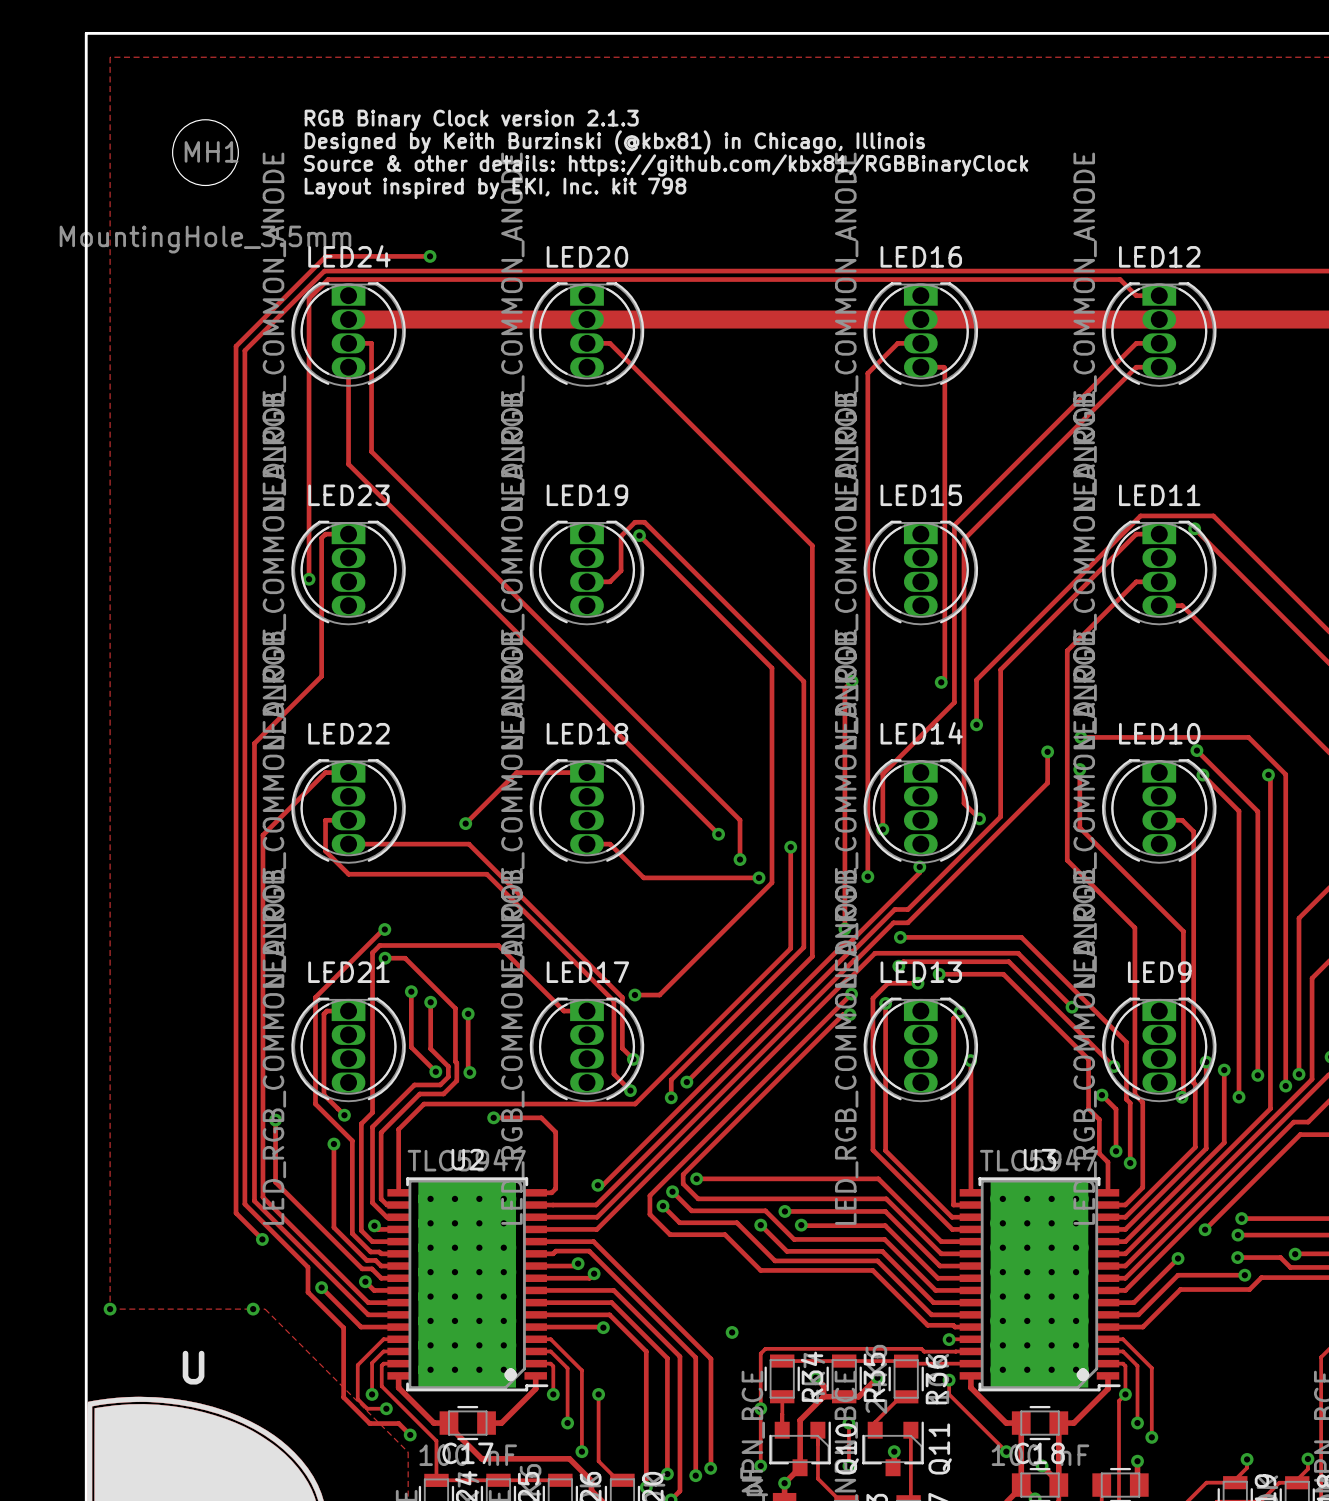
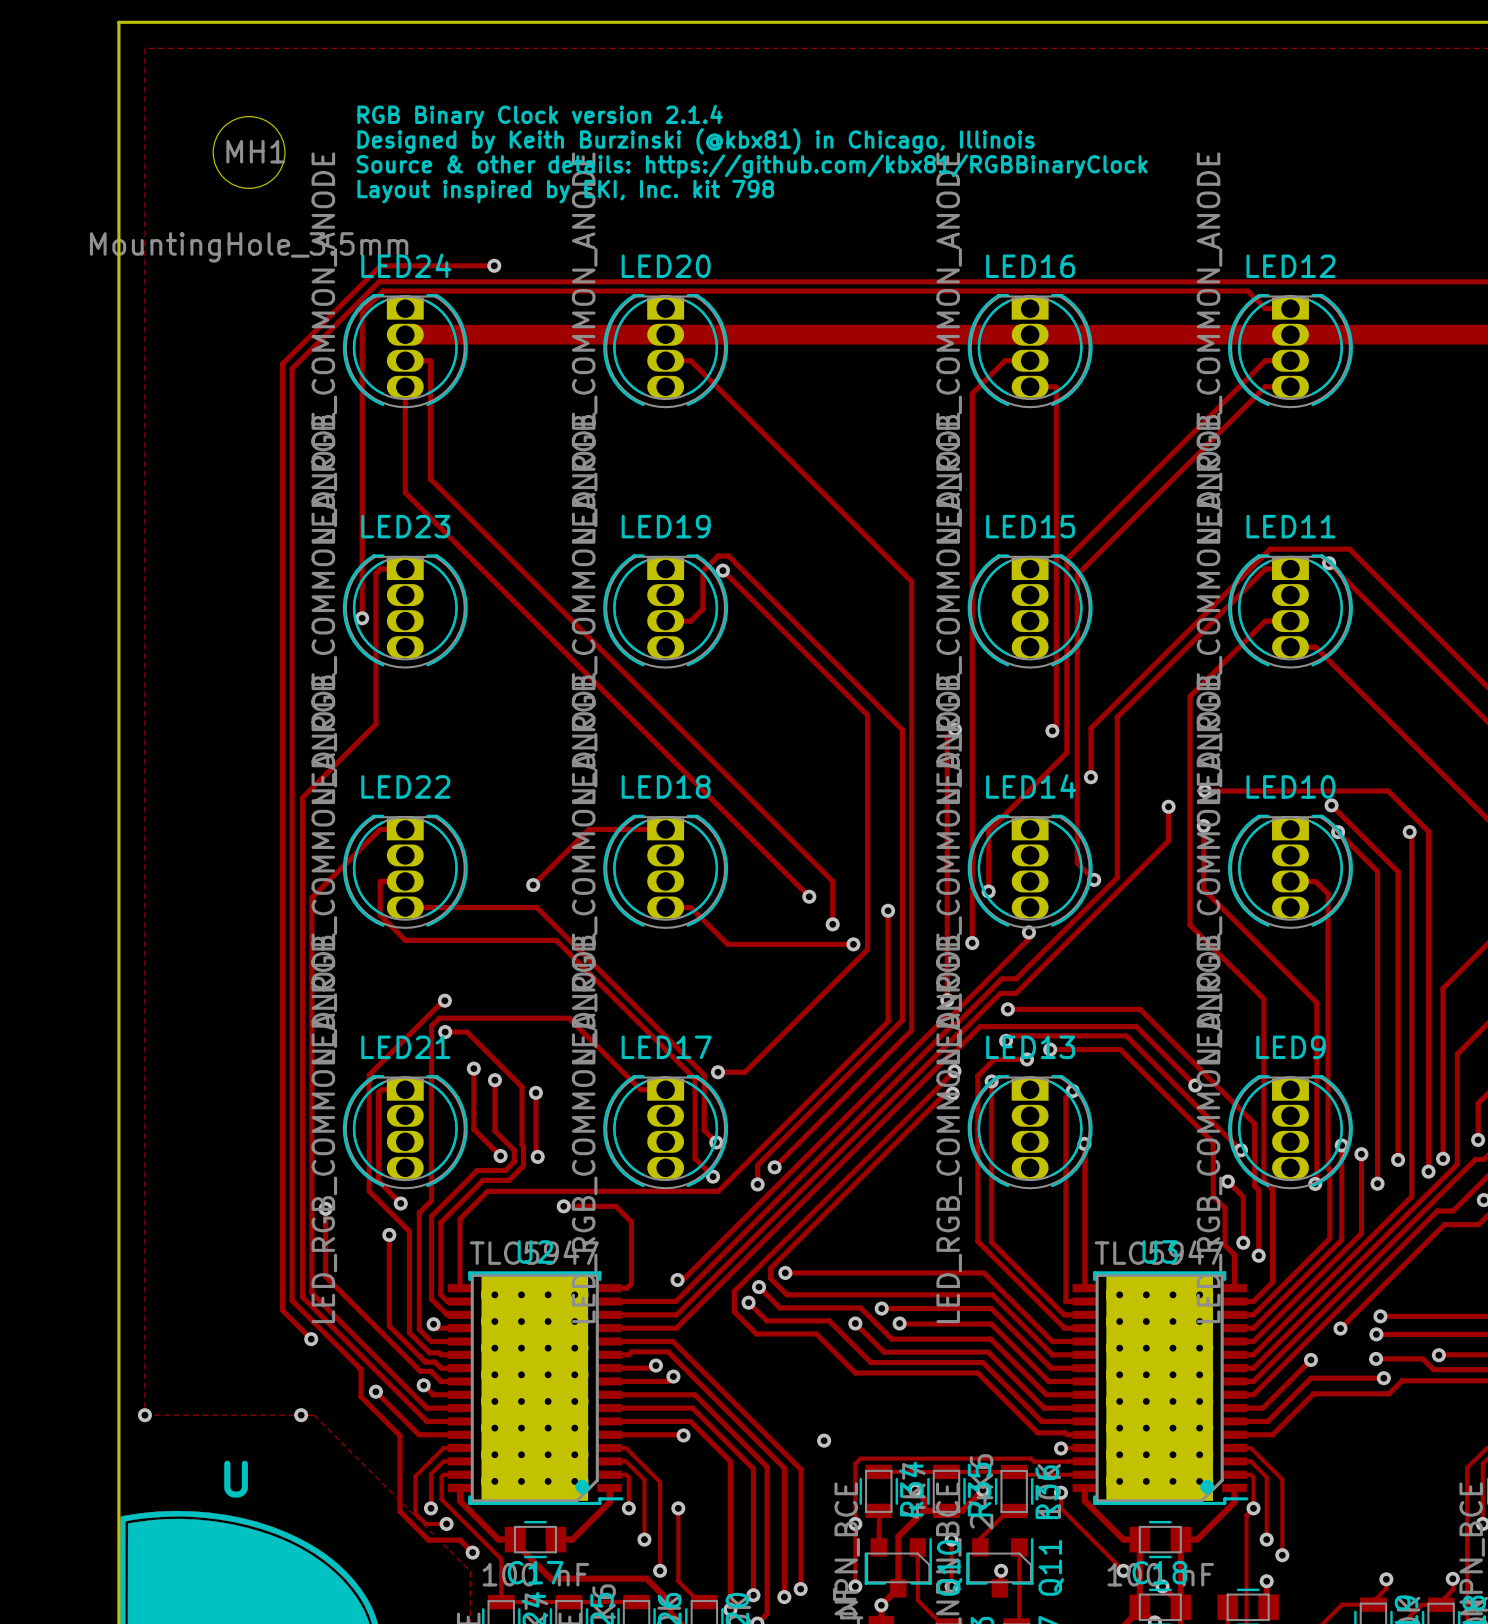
text: RGB Binary Clock version 2.1.3 (471, 120) -> RGB Binary Clock version 2.1.4 (540, 116)

